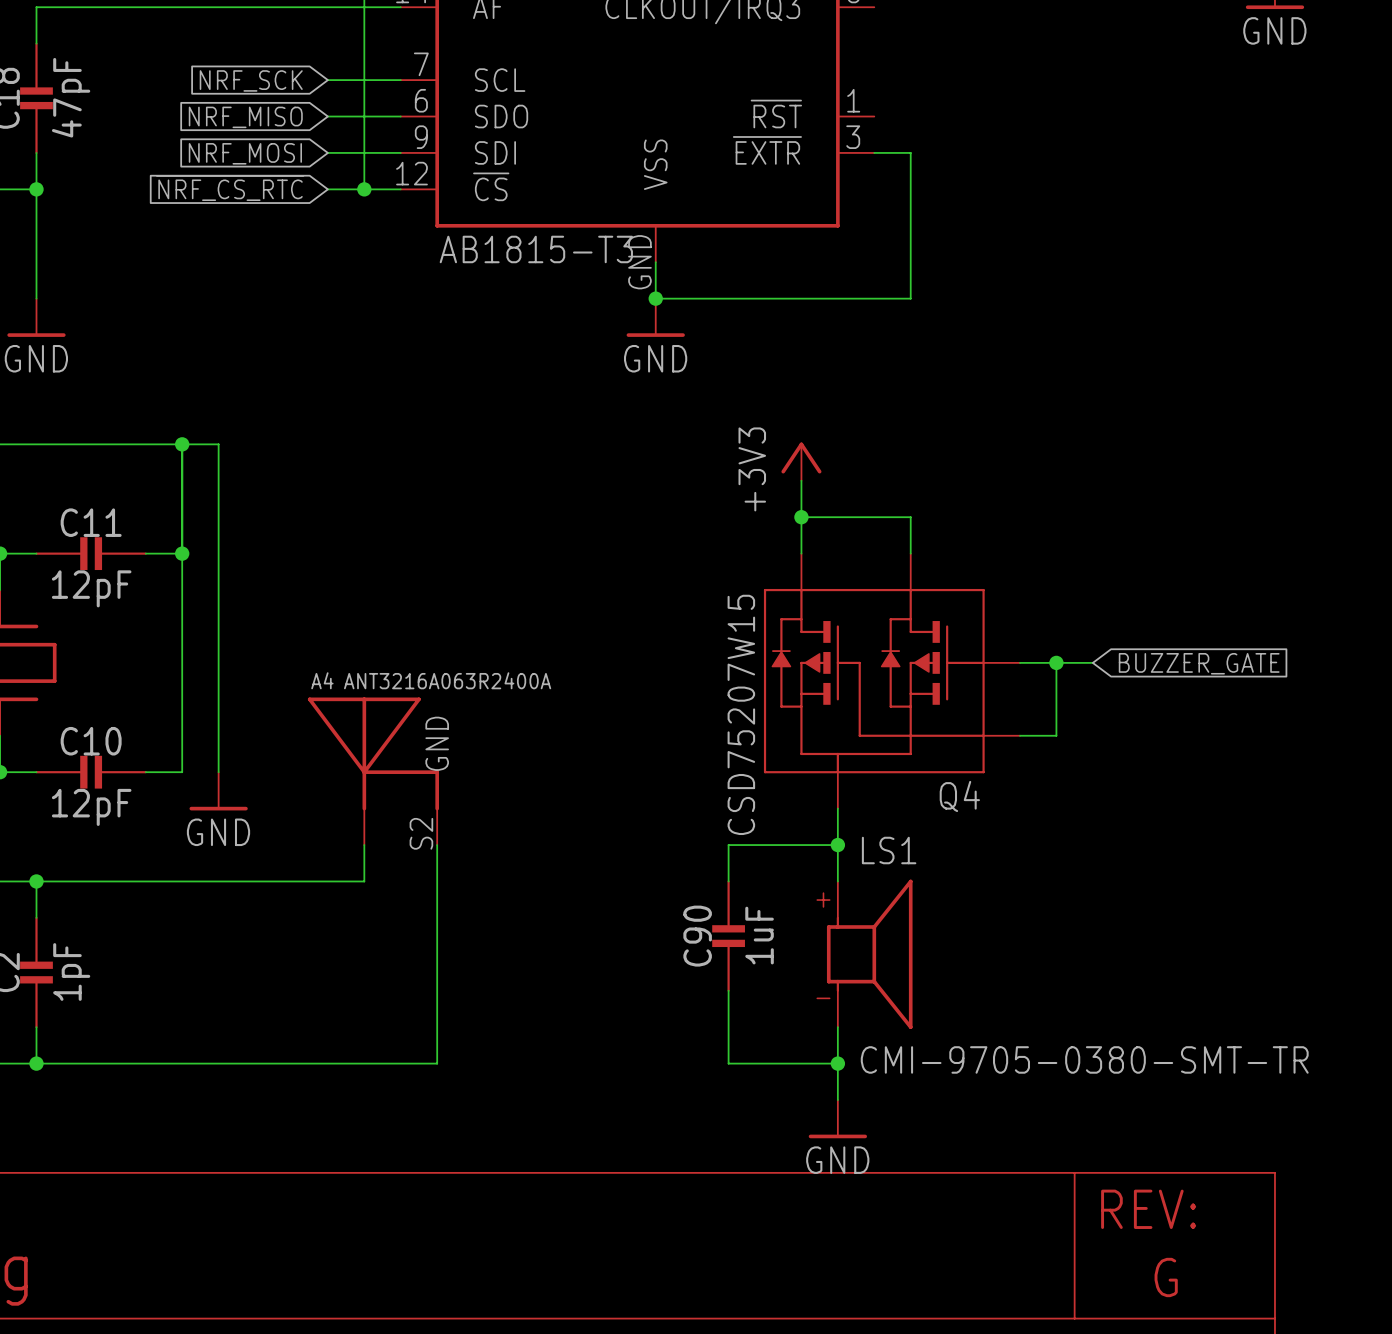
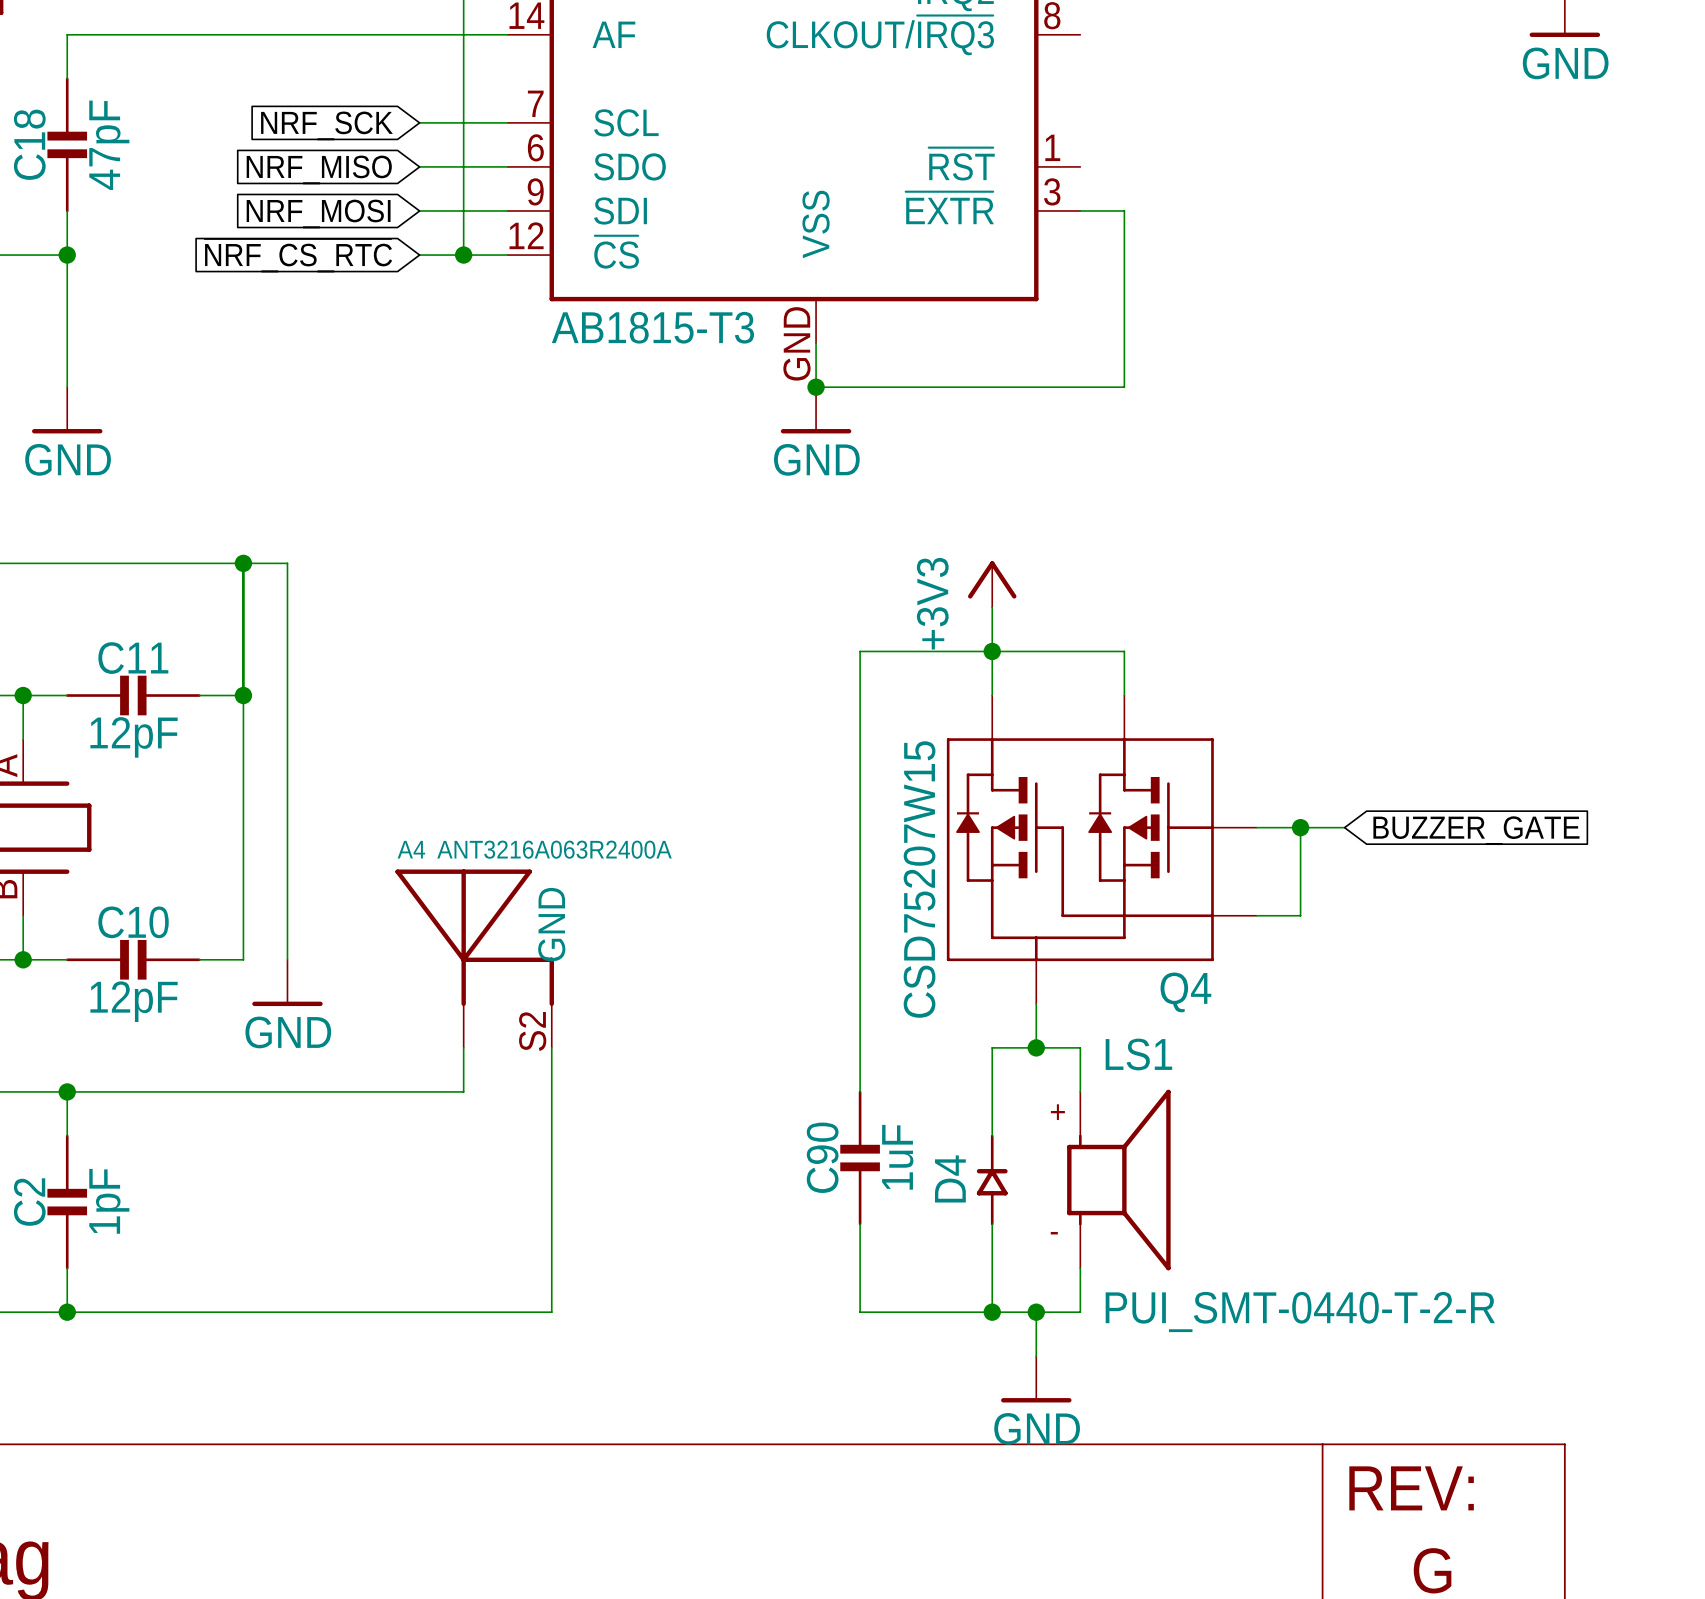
wire: none -> (992, 651) (860, 651) (860, 1091)
wire: (801, 845) (728, 845) (728, 881) -> (992, 1047) (992, 1135)
wire: (837, 845) (837, 881) -> (1036, 1047) (1080, 1047) (1080, 1091)
C90 position: (728, 936) -> (860, 1158)
D4: none -> (992, 1180)
LS1 position: (869, 954) -> (1118, 1180)
wire: (728, 990) (728, 1063) -> (860, 1224) (860, 1312) (904, 1312)
wire: none -> (992, 1224) (992, 1312)
wire: (837, 1027) (837, 1063) -> (1080, 1268) (1080, 1312) (1036, 1312)
LS1 value: CMI-9705-0380-SMT-TR (1084, 1059) -> PUI_SMT-0440-T-2-R (1300, 1312)
junction: none -> (992, 1312)

